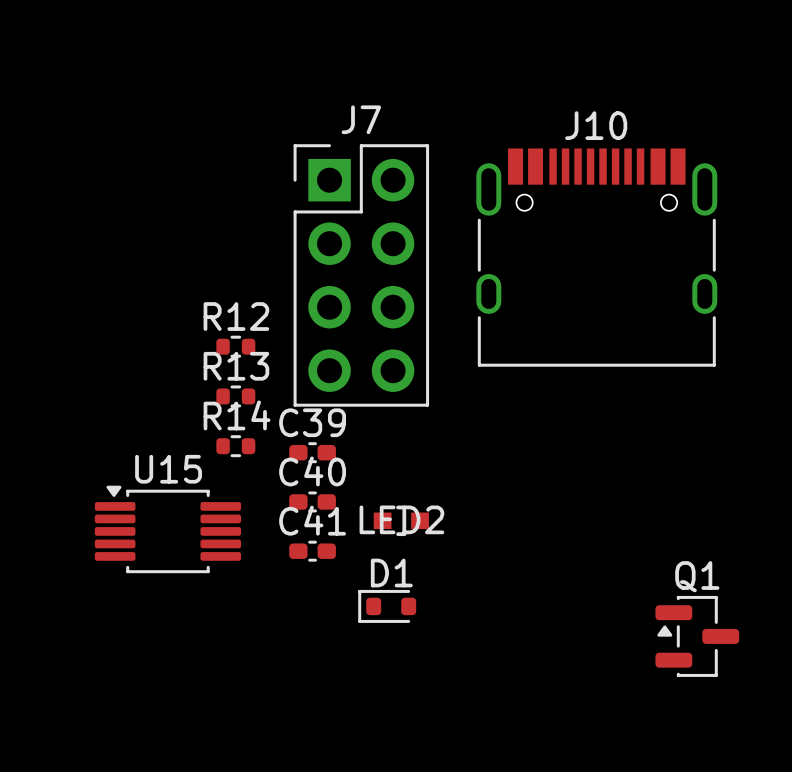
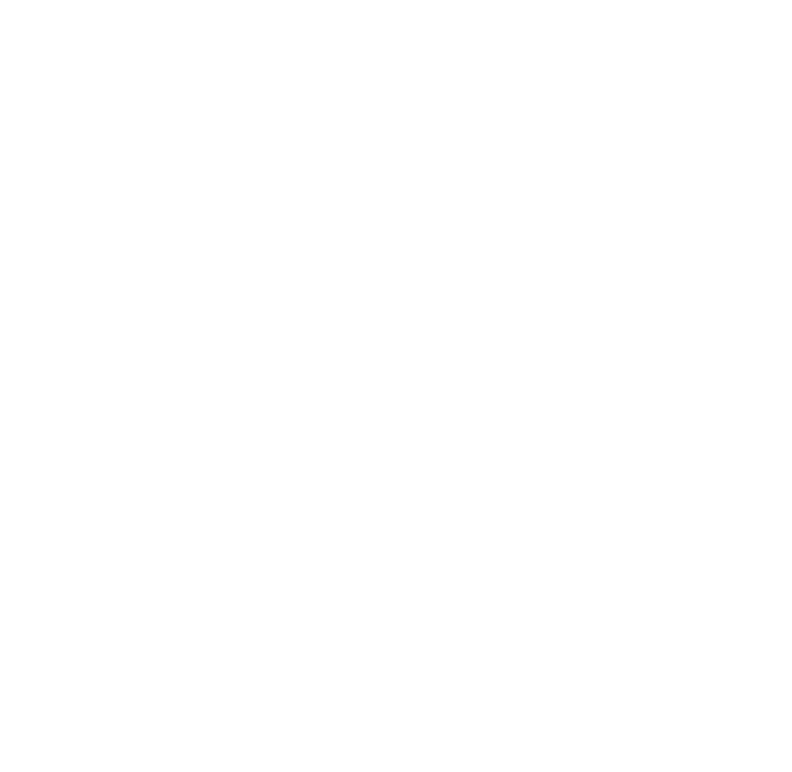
J10: (596, 257) -> none
J7: (361, 275) -> none
R12: (235, 346) -> none
R13: (235, 396) -> none
R14: (235, 446) -> none
C39: (312, 452) -> none
C40: (312, 501) -> none
LED2: (401, 520) -> none
U15: (167, 529) -> none
C41: (312, 551) -> none
D1: (387, 606) -> none
Q1: (697, 636) -> none

